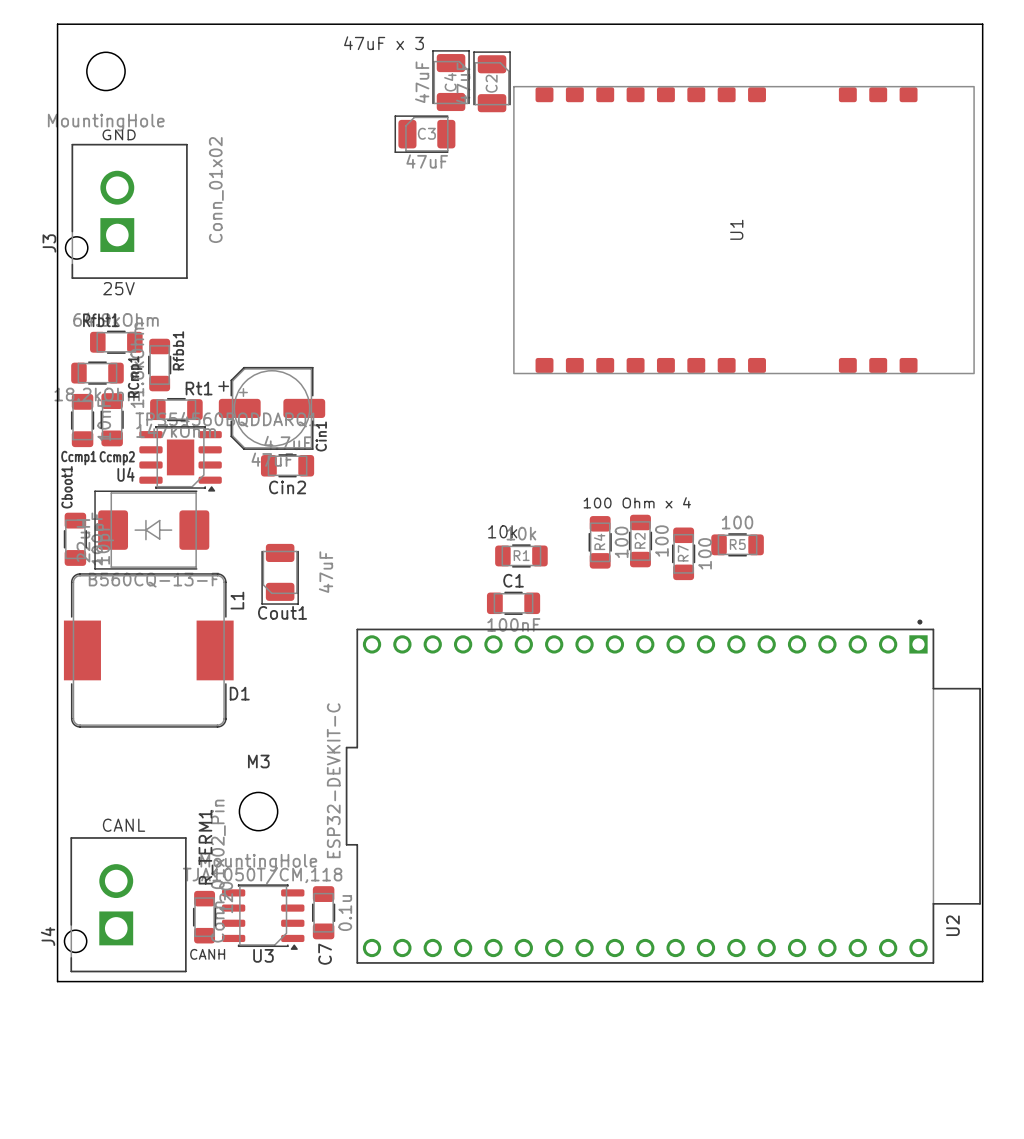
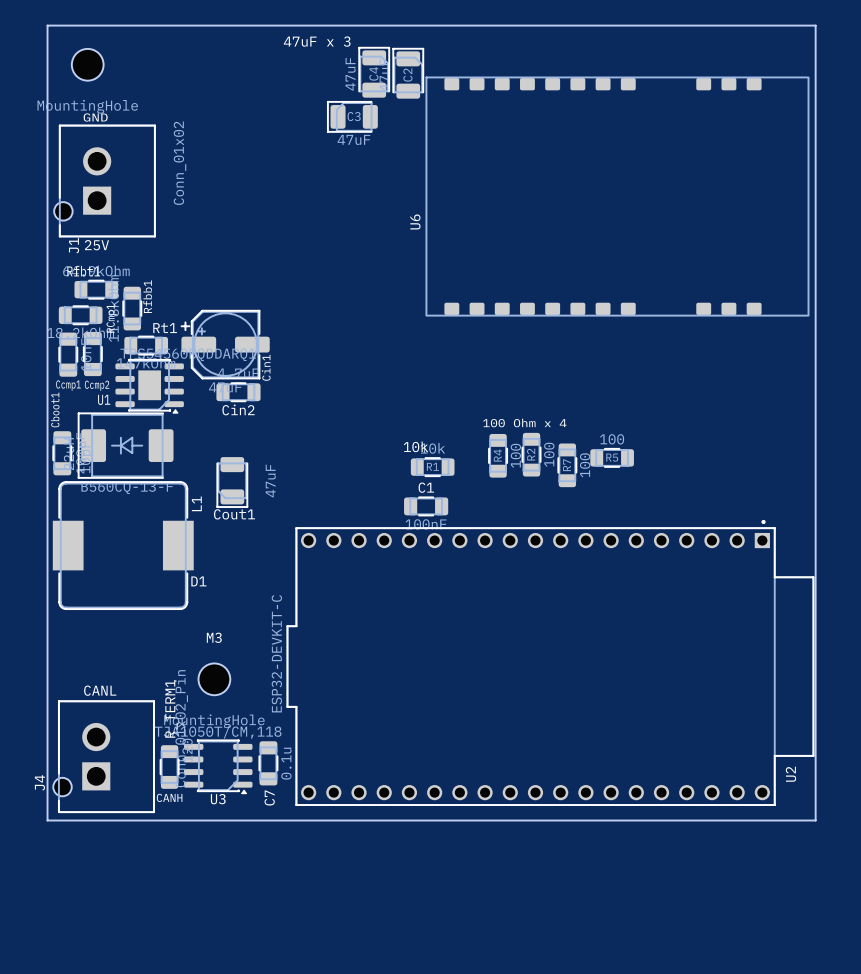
U1 name: U1 (736, 229) -> U6 (415, 221)
J3 name: J3 (49, 243) -> J1 (74, 245)
U4 name: U4 (126, 474) -> U1 (104, 399)

